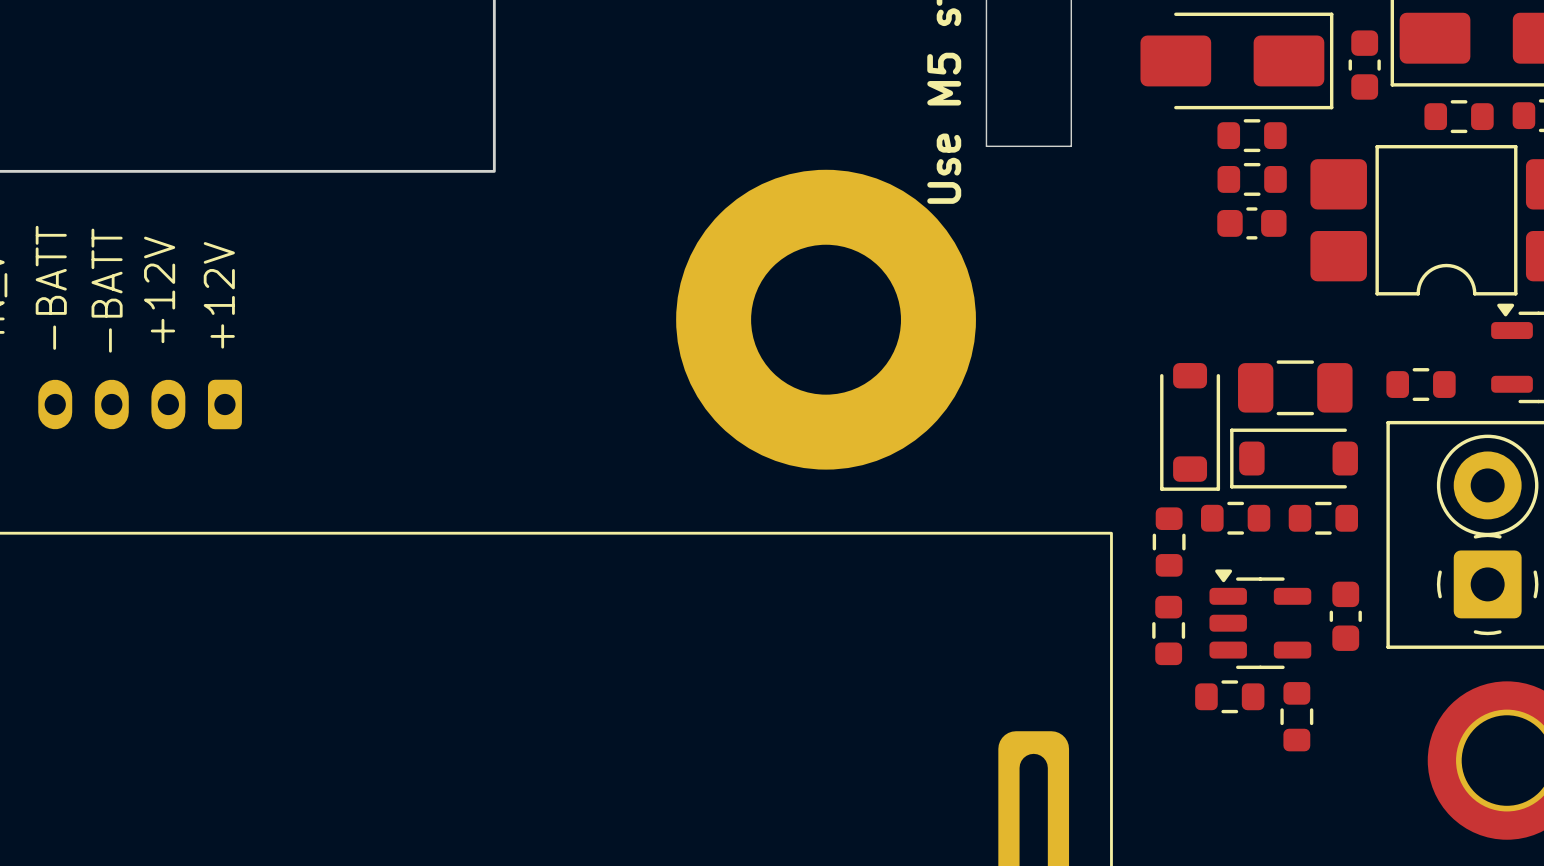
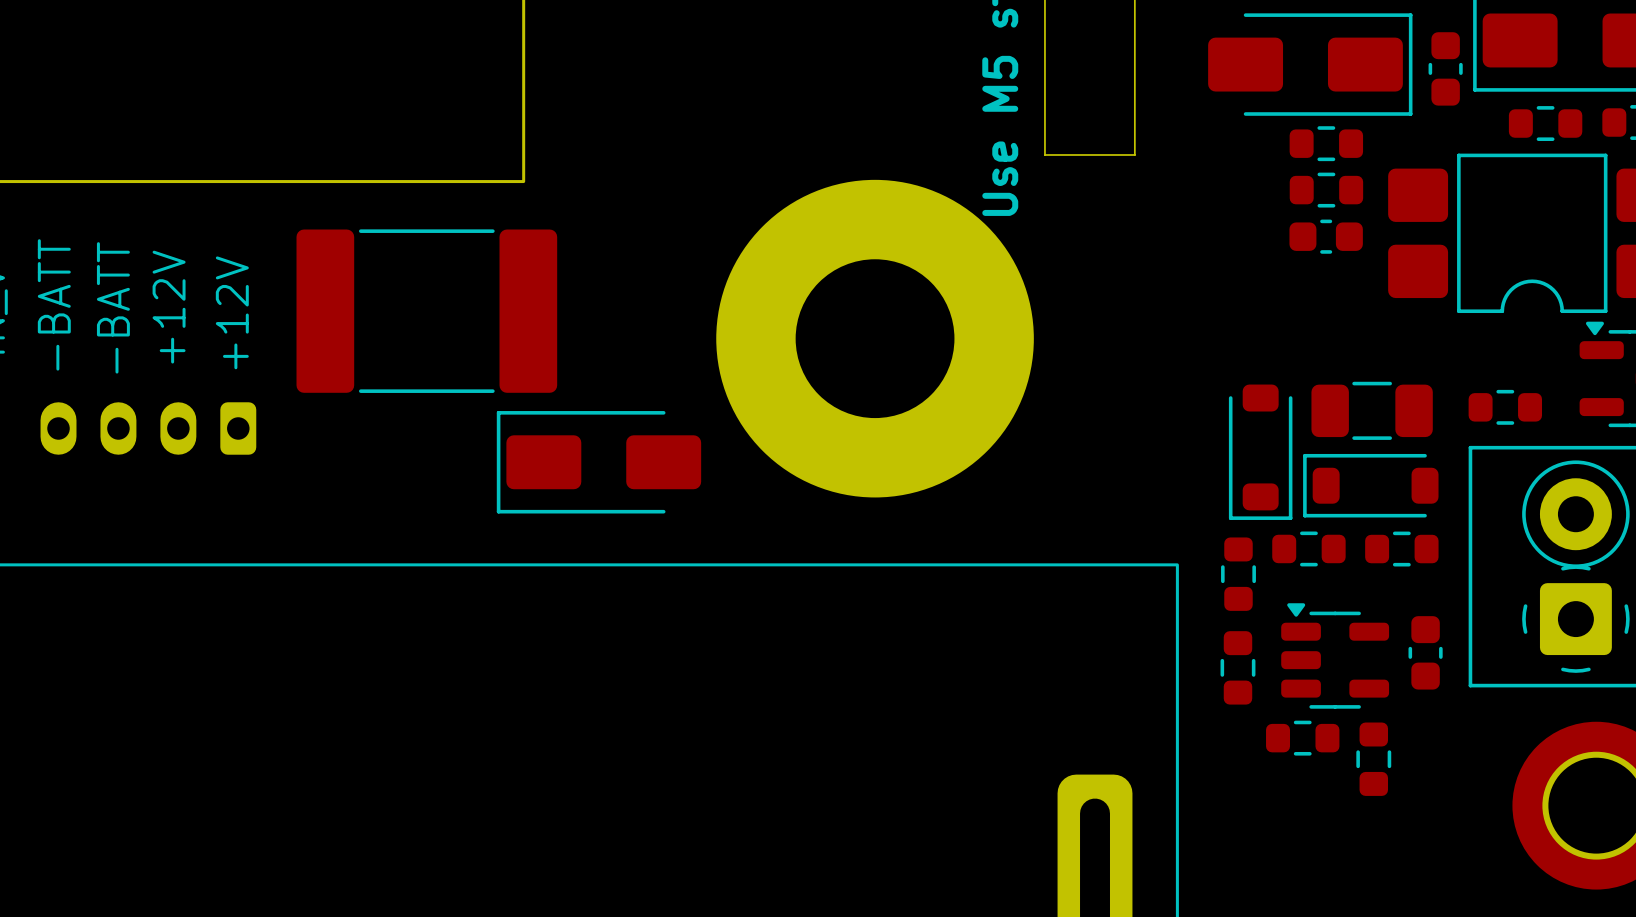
part: none -> (426, 311)
part: none -> (598, 462)

